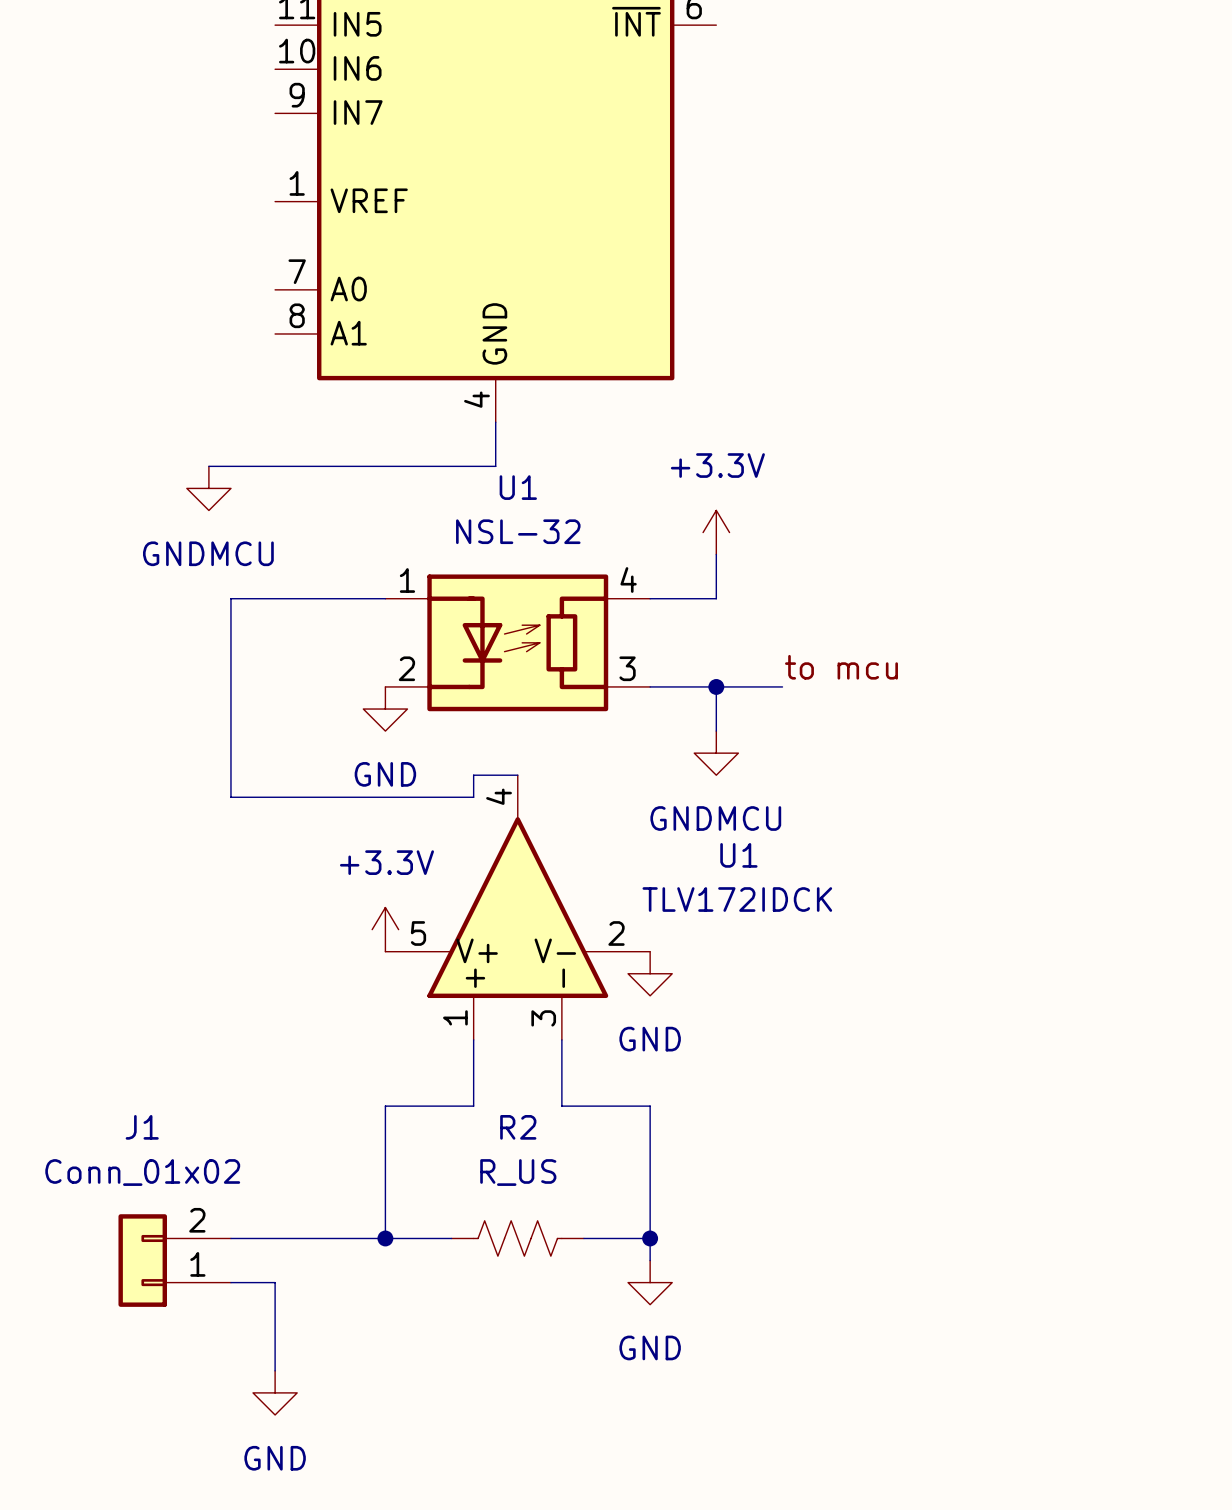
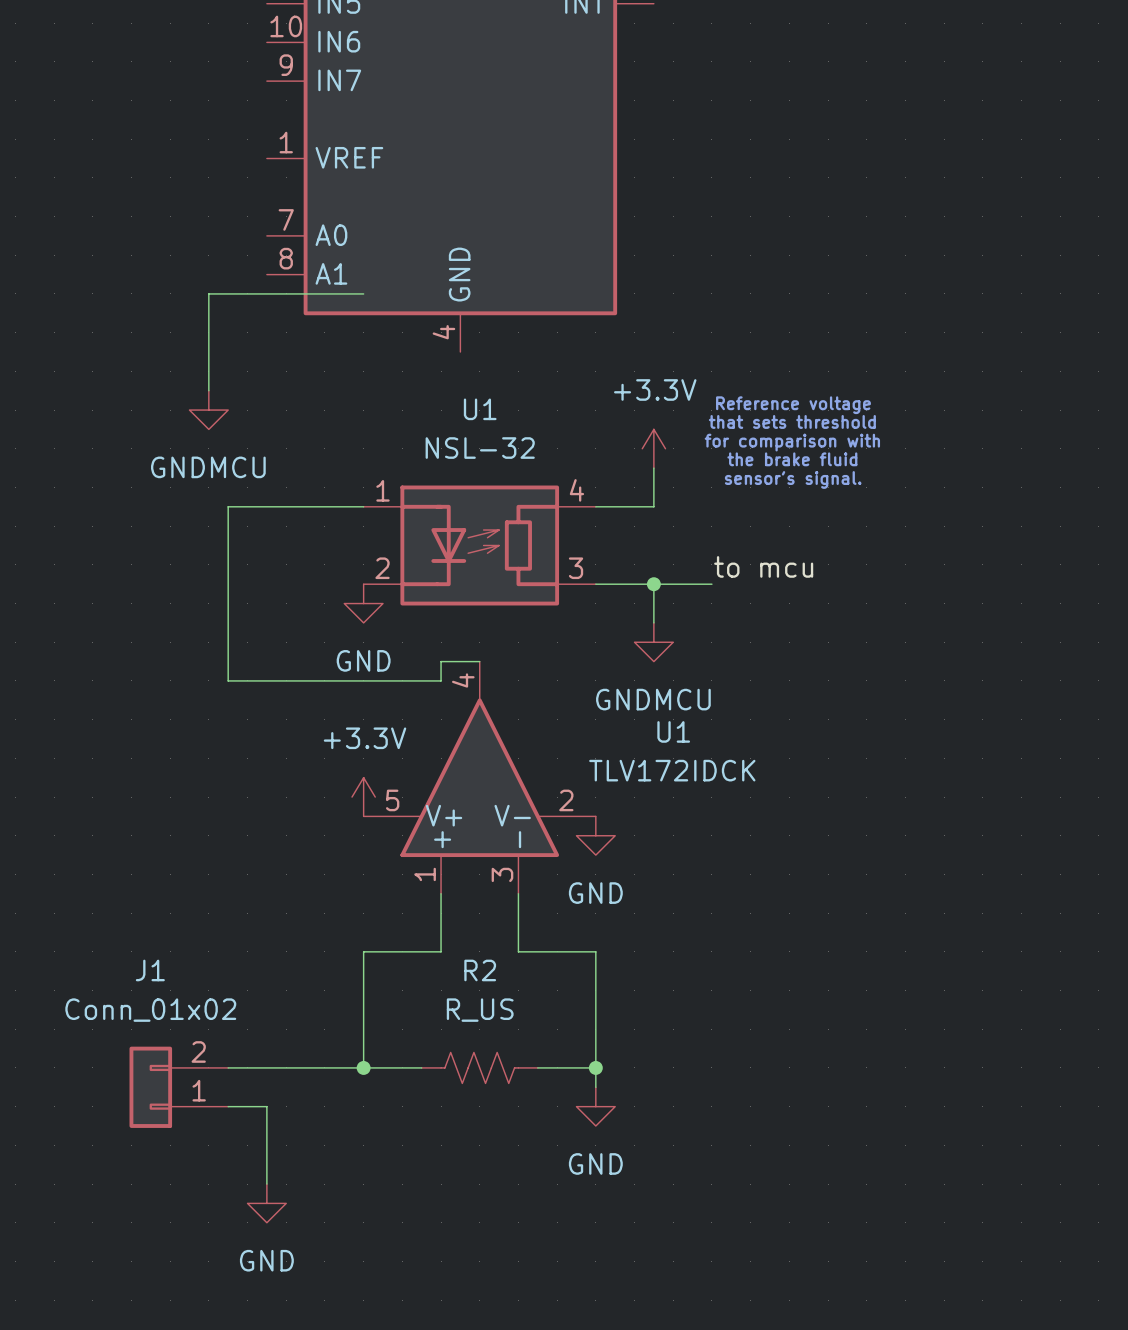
wire: (495, 422) (495, 466) (208, 466) -> (363, 293) (208, 293) (208, 390)
text: none -> Reference voltage (793, 405)
text: none -> that sets threshold (792, 421)
text: none -> for comparison with (792, 442)
text: none -> the brake fluid (792, 459)
text: none -> sensor's signal. (793, 479)

